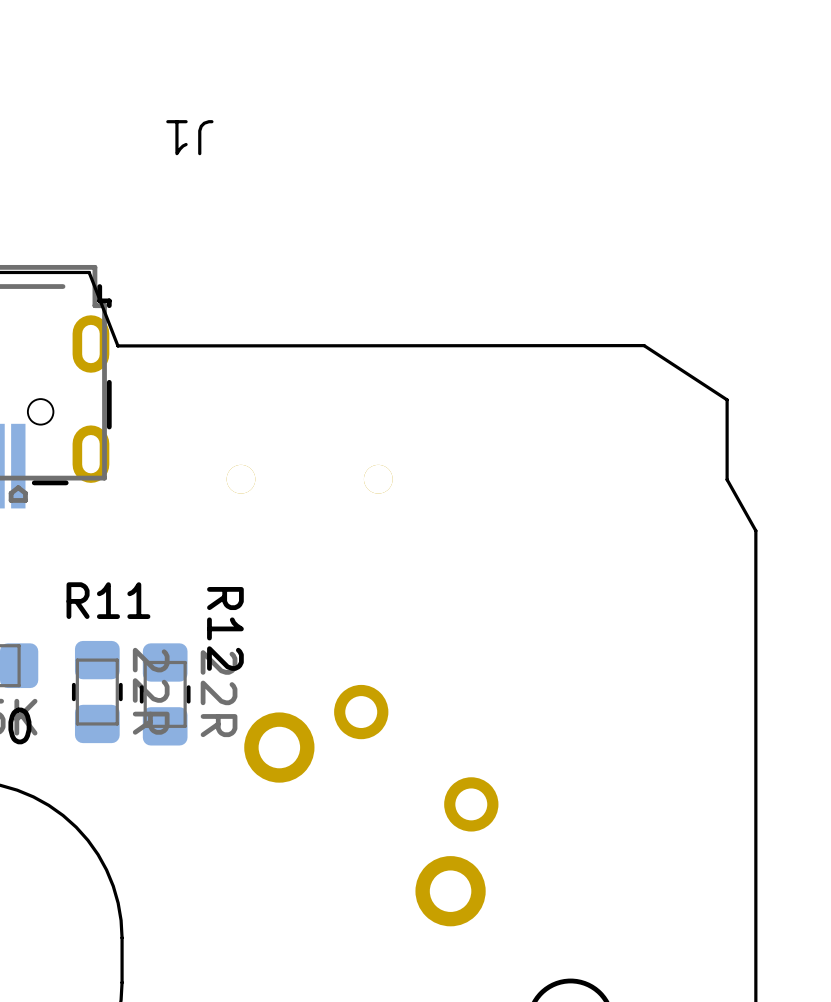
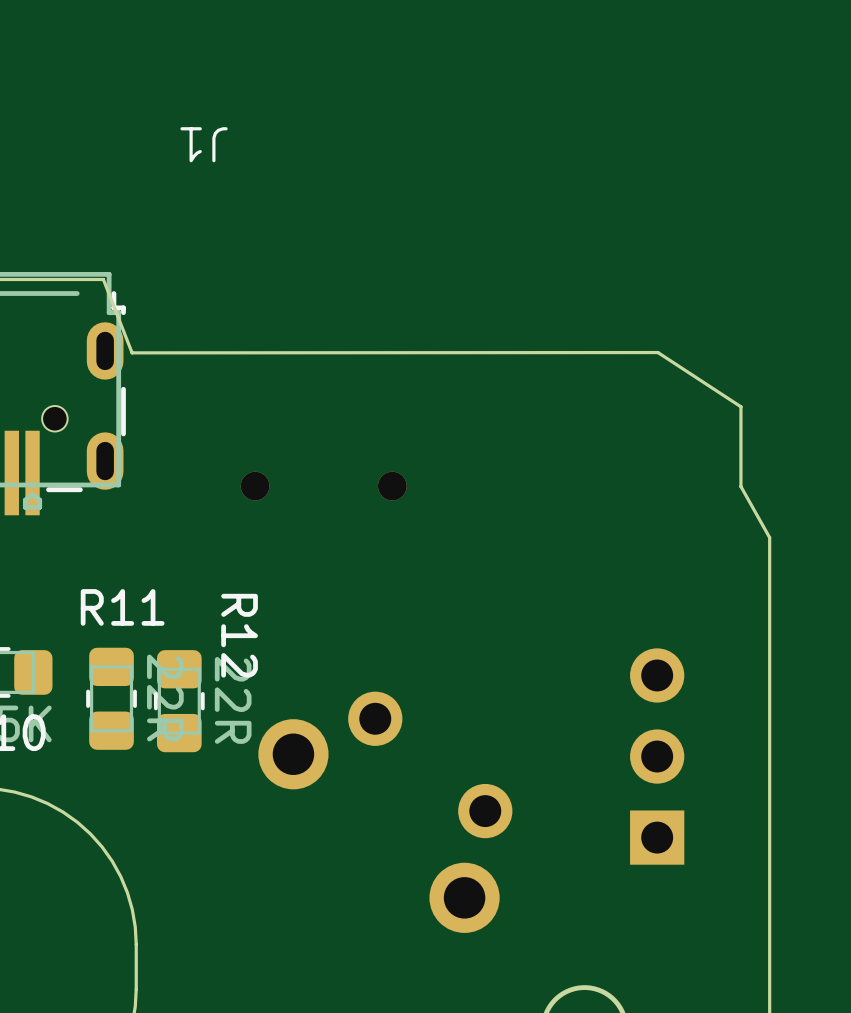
part: none -> (657, 756)

